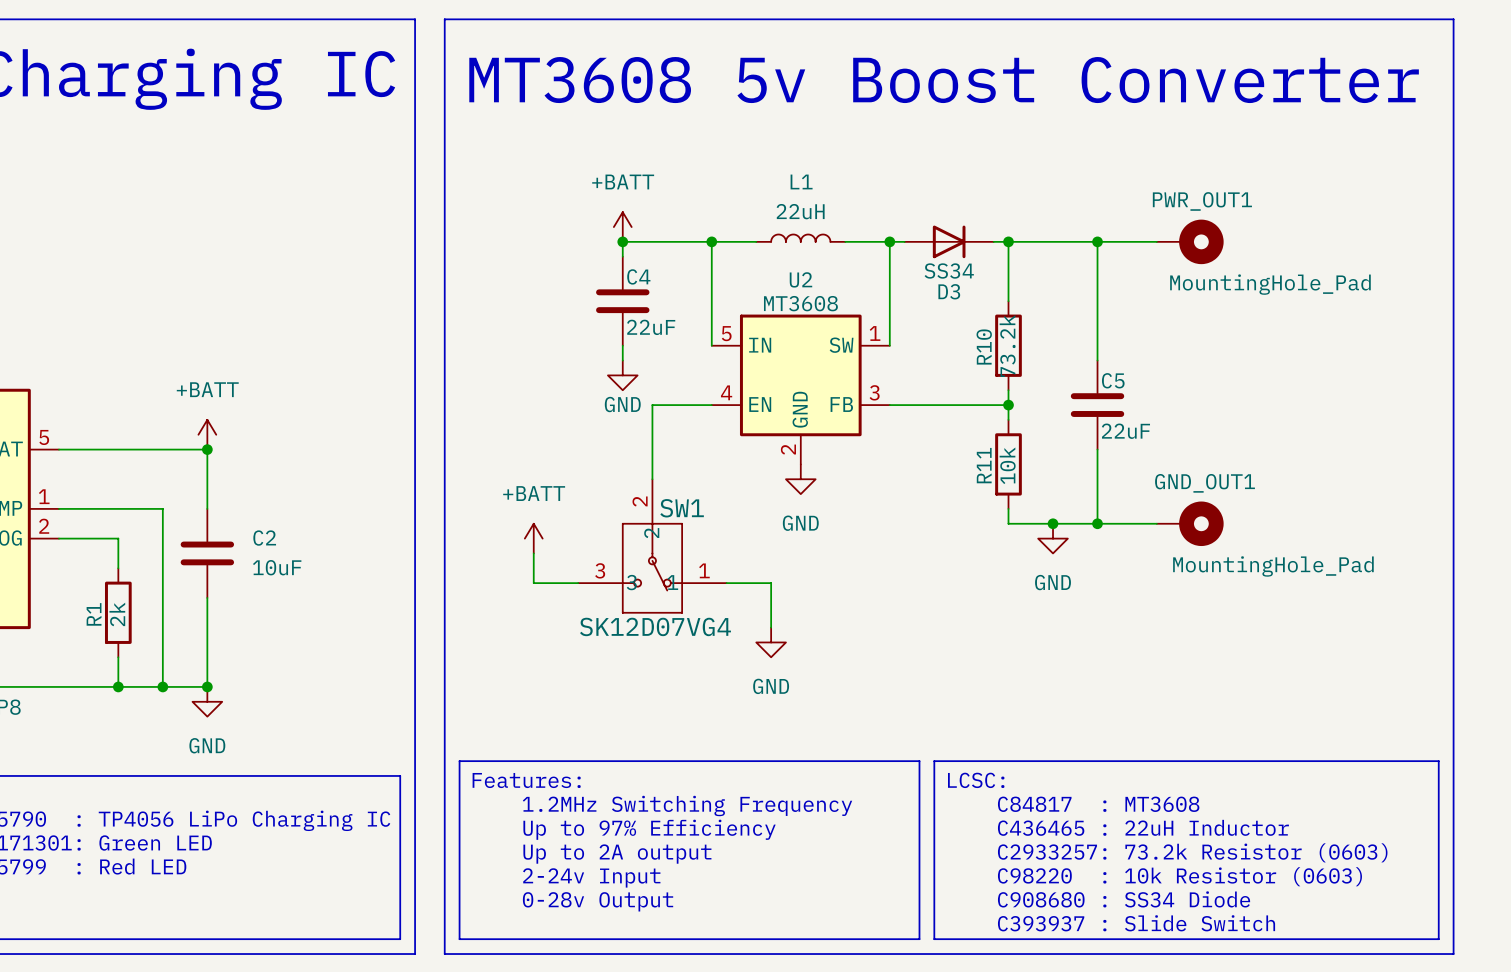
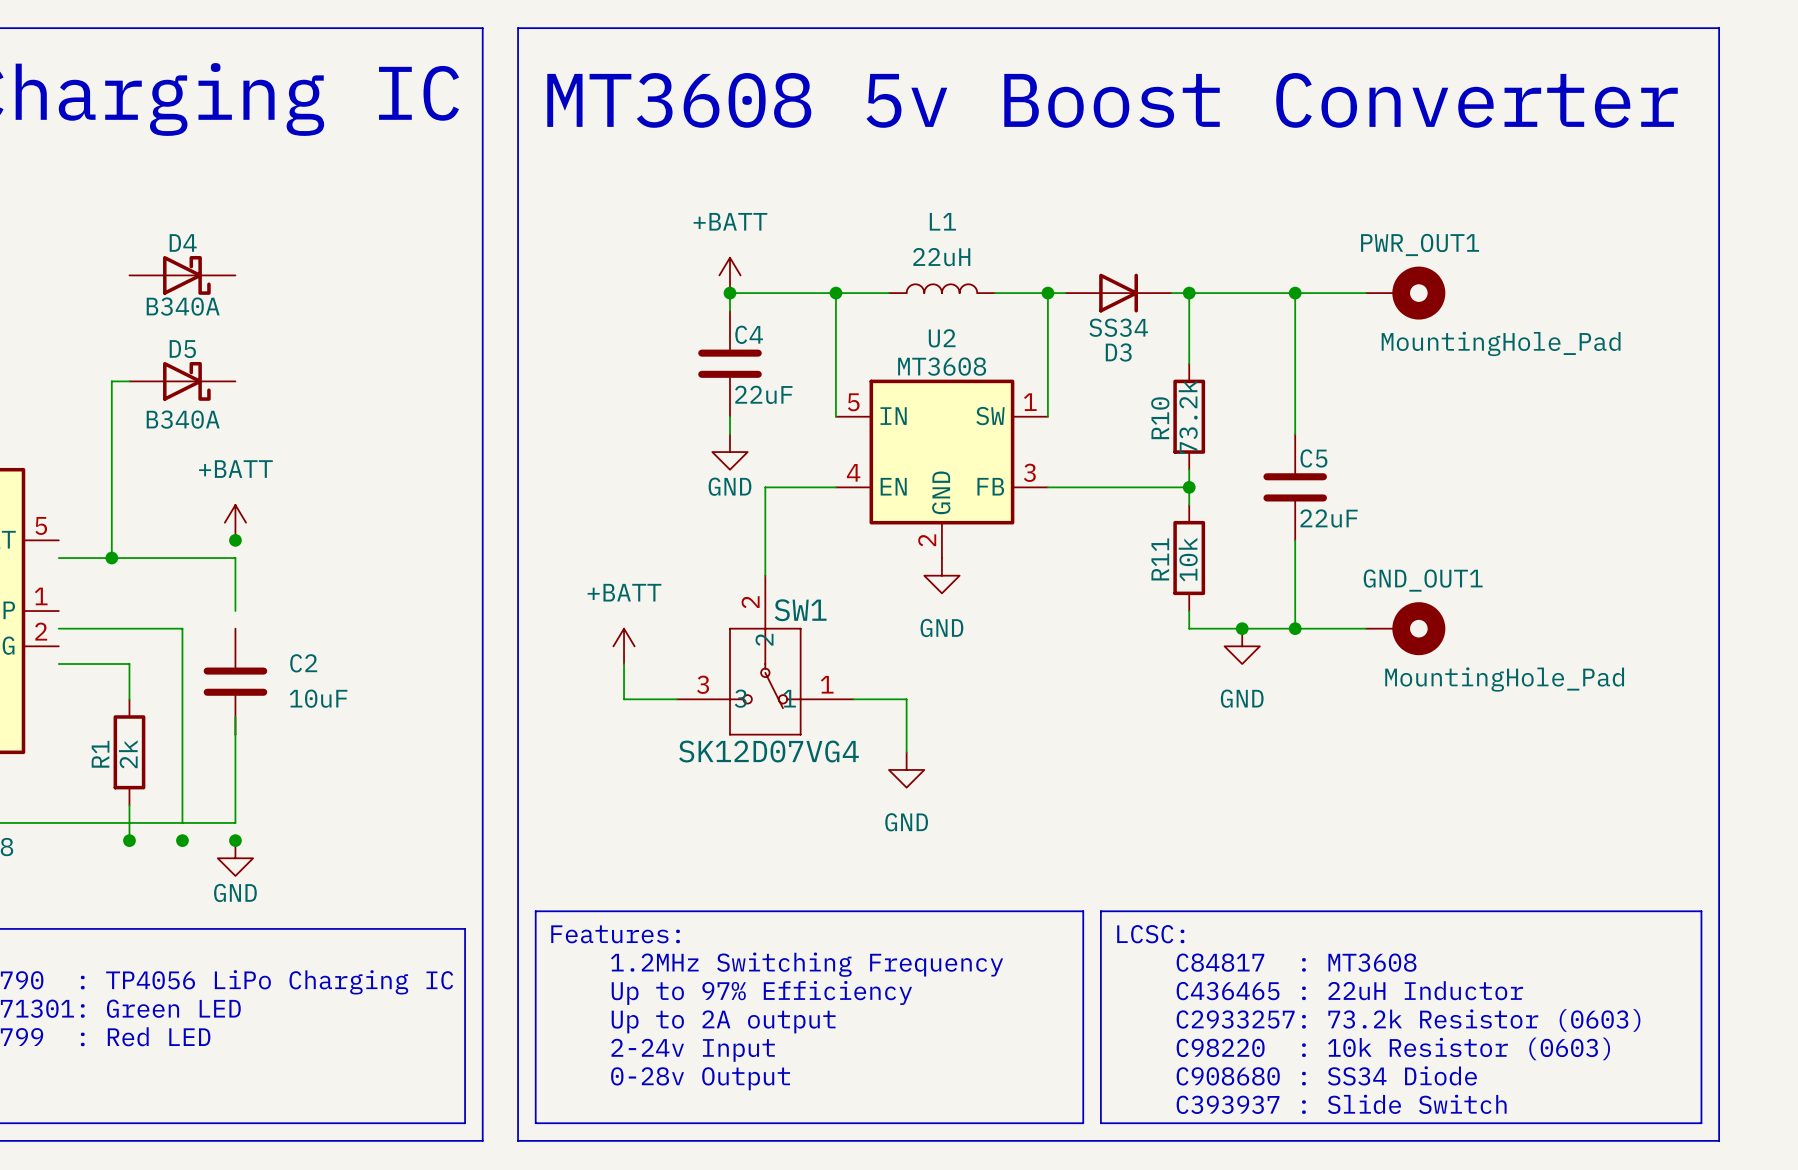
D4: none -> B340A (182, 275)
wire: none -> (129, 381) (111, 381) (111, 558)
D5: none -> B340A (182, 381)
wire: (58, 449) (207, 449) (207, 464) -> (58, 558) (235, 558)
junction: none -> (111, 558)
wire: (58, 508) (162, 508) (162, 523) -> (58, 628) (182, 628)
wire: (58, 538) (118, 538) (118, 553) -> (58, 664) (129, 664)
C2 position: (207, 553) -> (235, 681)
R1 position: (118, 612) -> (129, 752)
junction position: (118, 686) -> (129, 840)
junction position: (162, 686) -> (182, 840)
junction position: (207, 686) -> (235, 840)
power symbol position: GND (207, 701) -> GND (235, 858)

